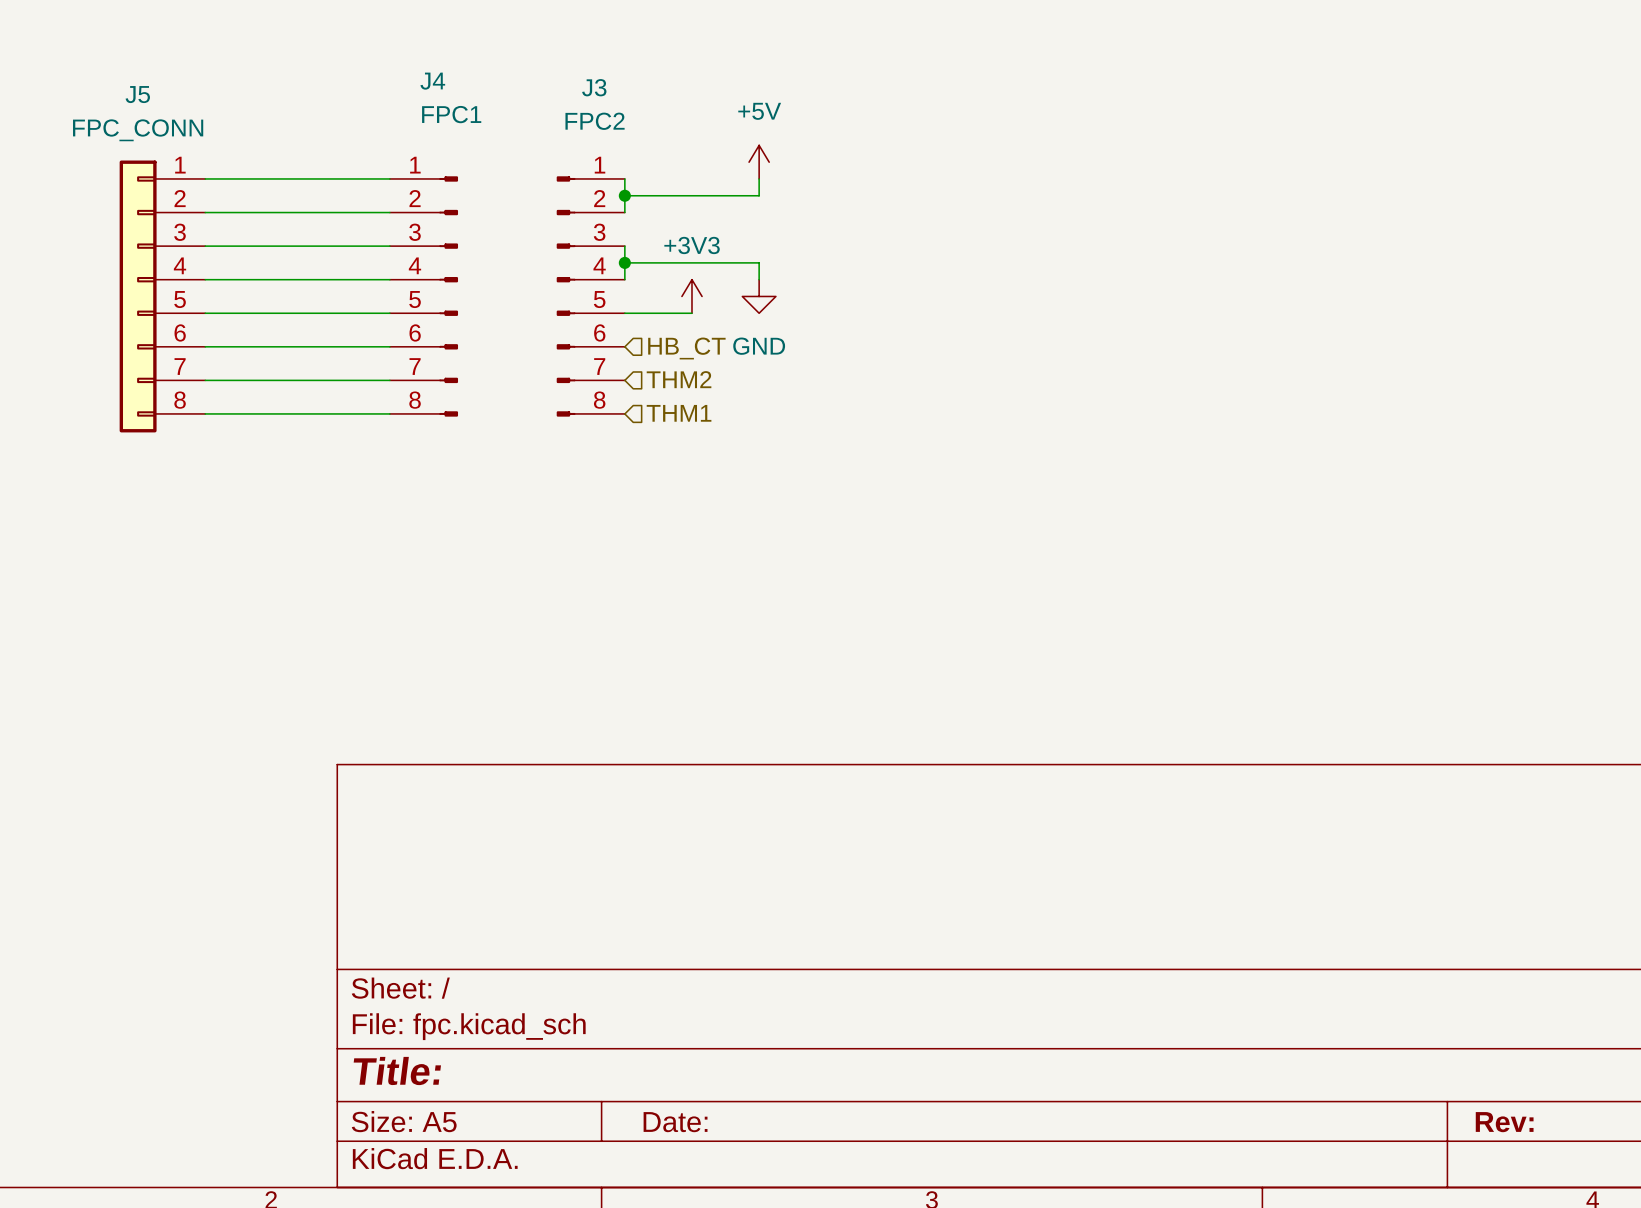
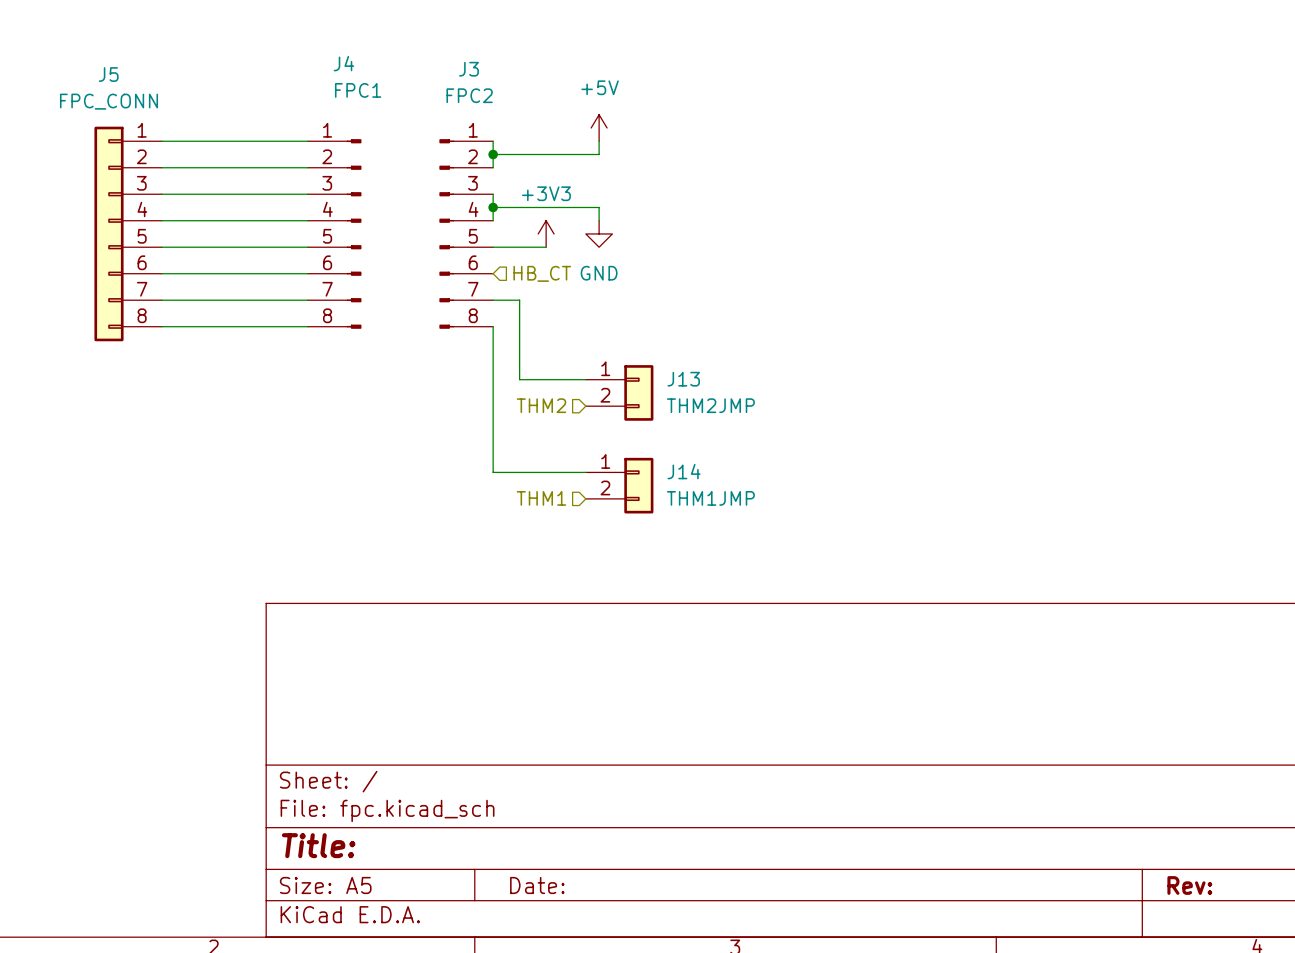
hierarchical label rotation: 0° (679, 379) -> 180° (541, 405)
hierarchical label position: THM2 (679, 379) -> THM2 (541, 405)
wire: none -> (493, 300) (519, 300) (519, 379) (585, 379)
wire: none -> (493, 326) (493, 472) (585, 472)
hierarchical label rotation: 0° (679, 413) -> 180° (541, 498)
hierarchical label position: THM1 (679, 413) -> THM1 (541, 498)
J13: none -> THM2JMP (619, 392)
J14: none -> THM1JMP (619, 485)

